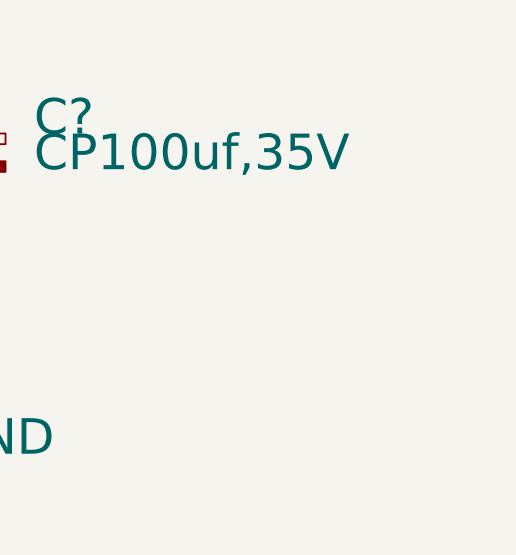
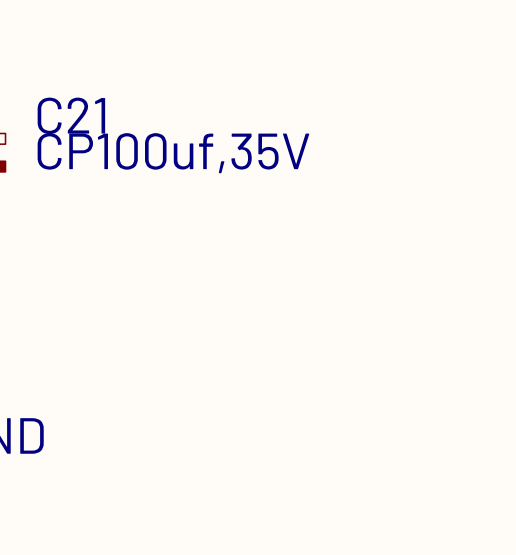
C? name: C? (63, 115) -> C21 (71, 115)

